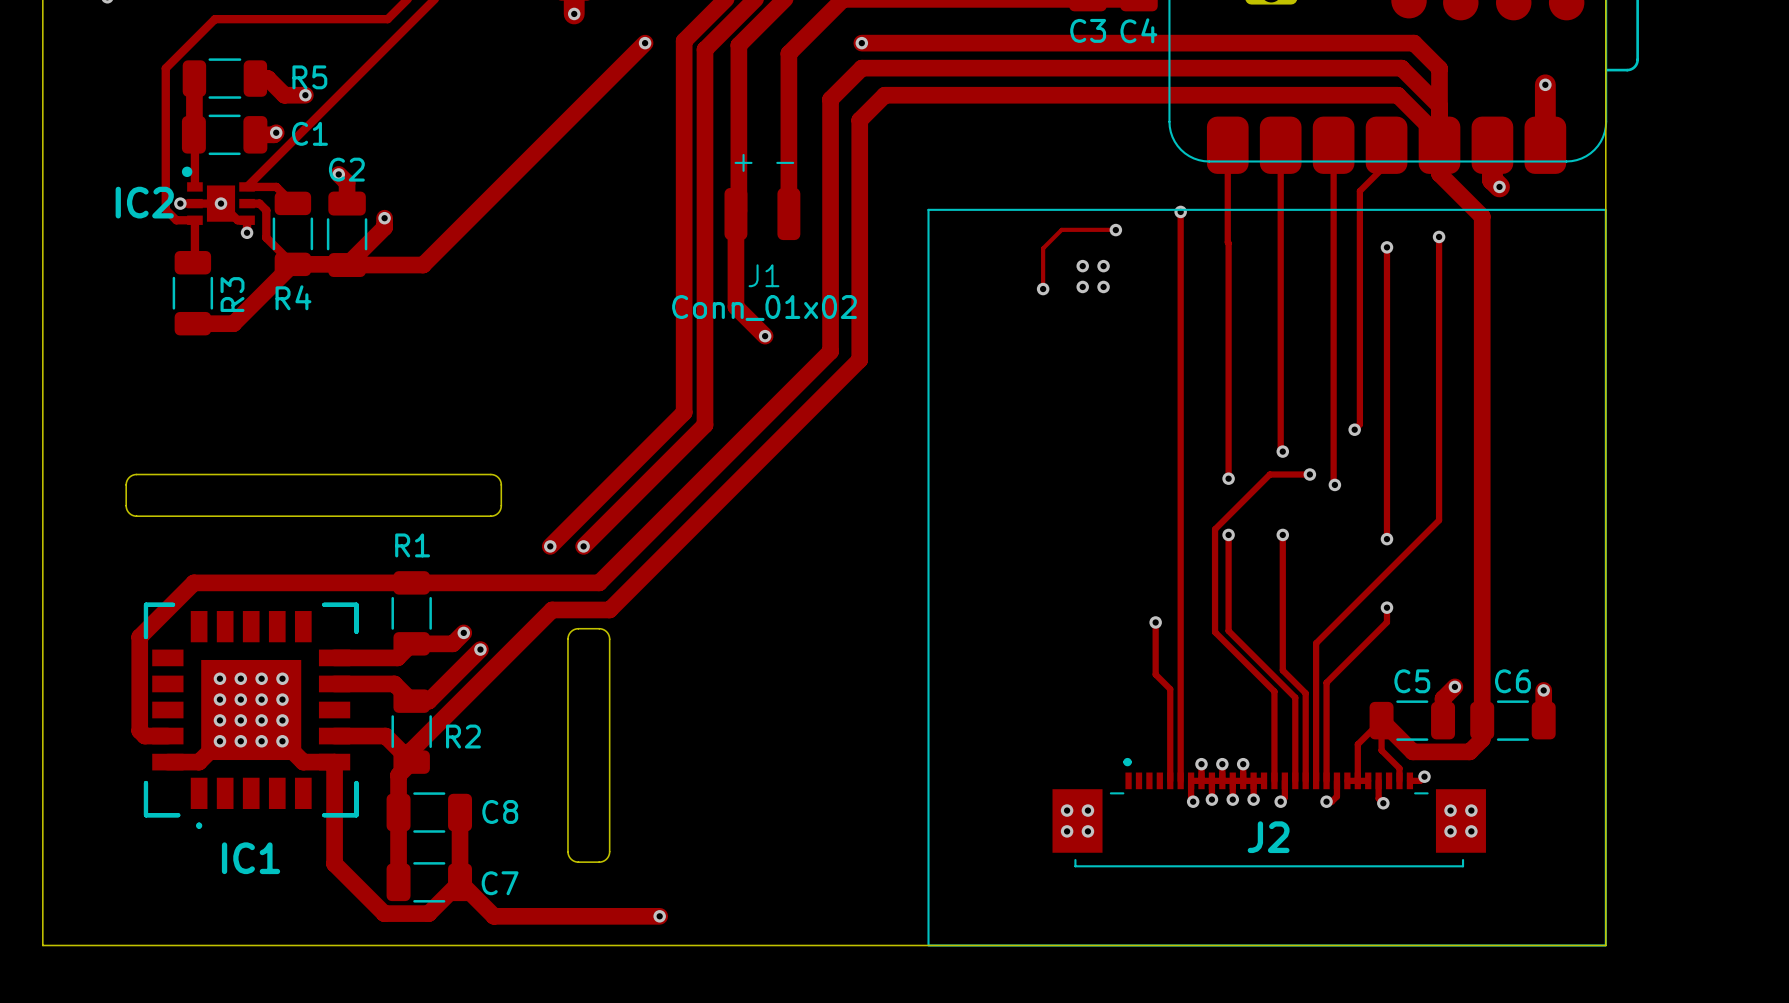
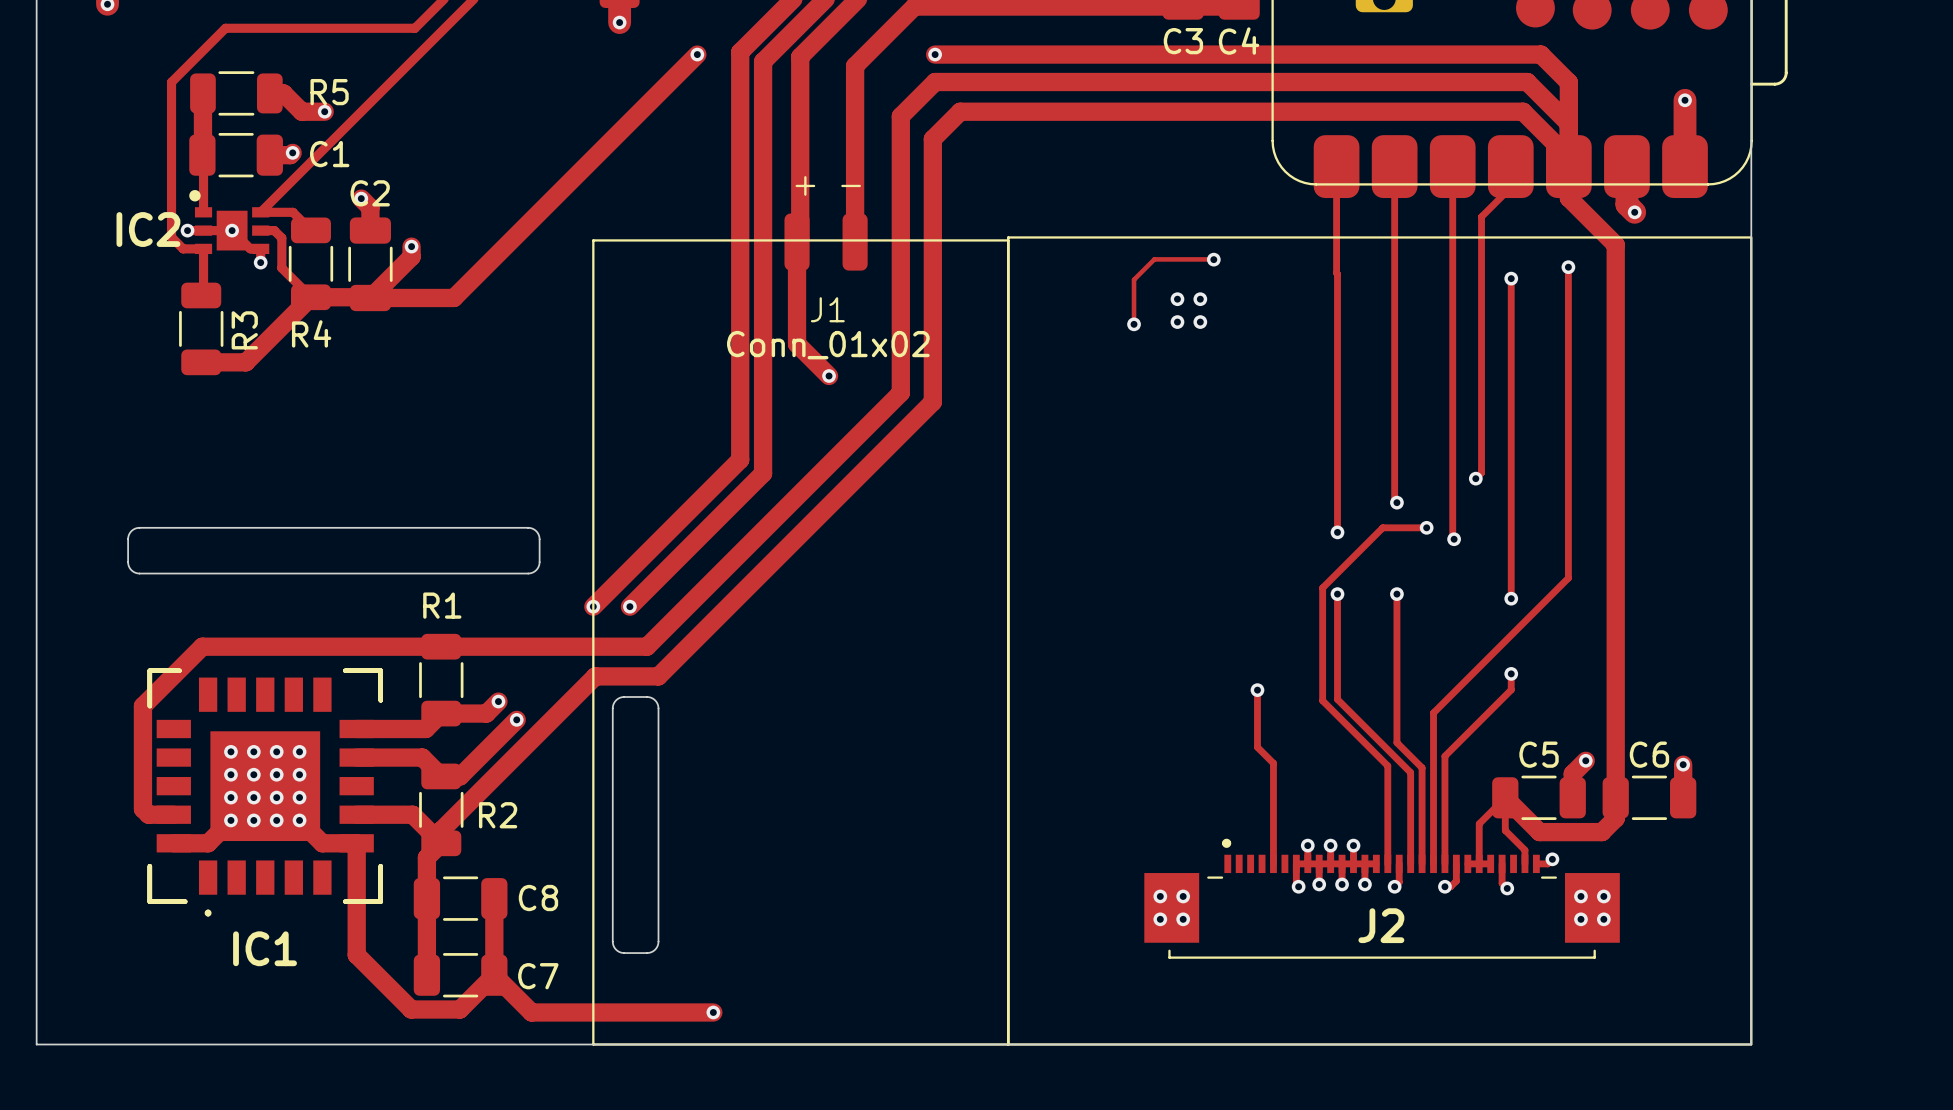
track: (1180, 211) (1180, 780) -> none
via: (1180, 211) -> none
line: none -> (593, 240) (1008, 240) (1008, 1044) (593, 1044) (593, 240)

